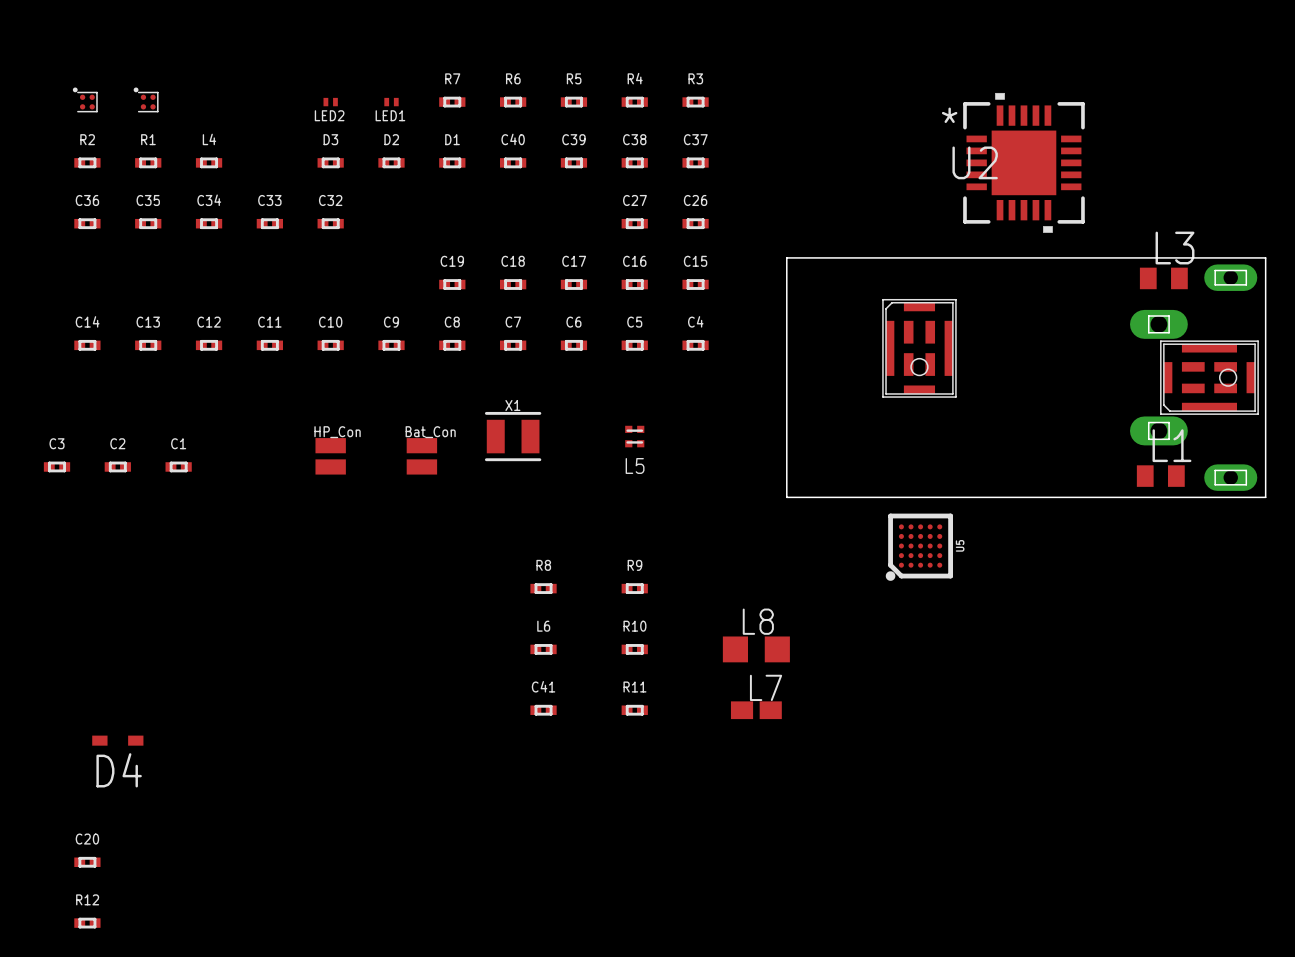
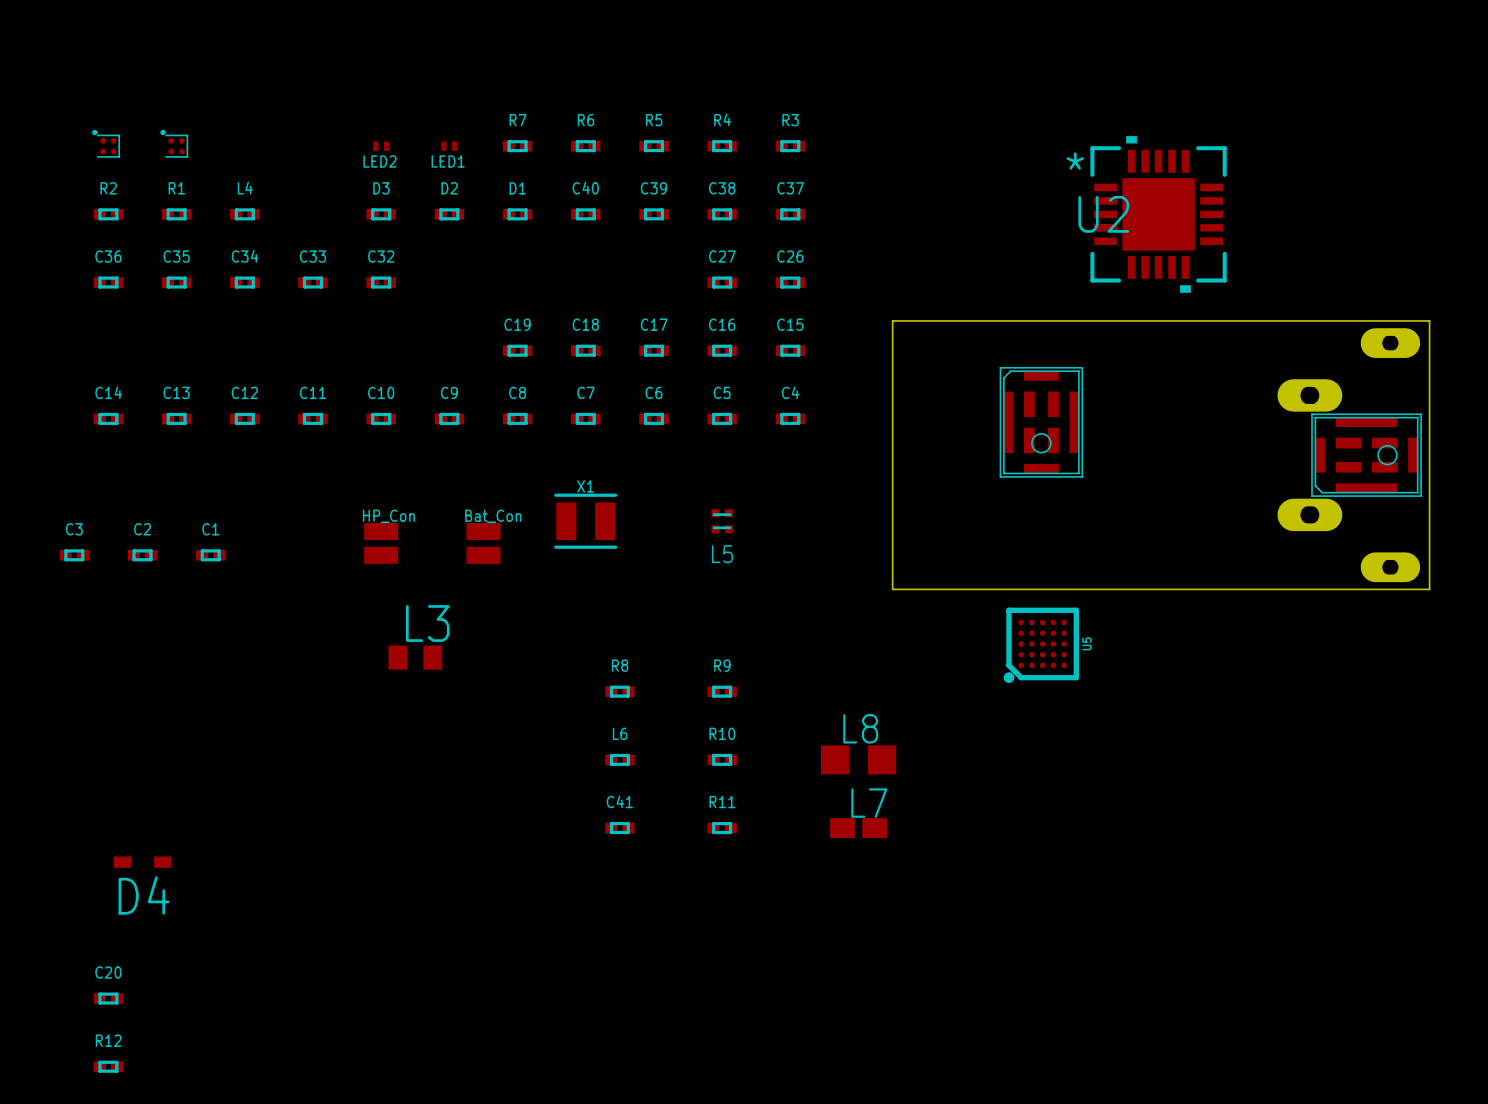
L3 position: (1163, 278) -> (415, 657)
L1: (1160, 476) -> none

